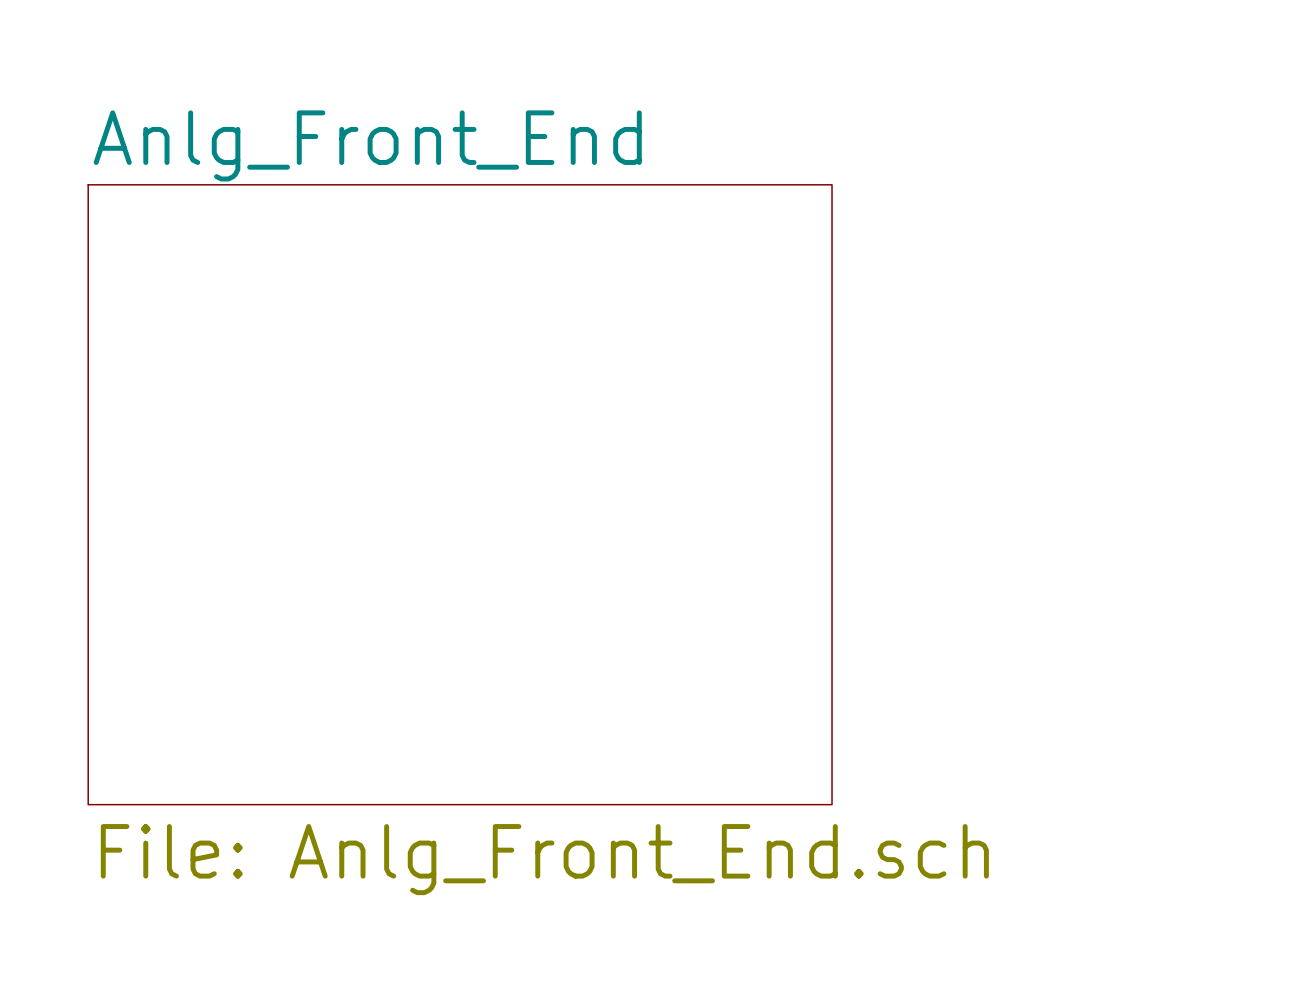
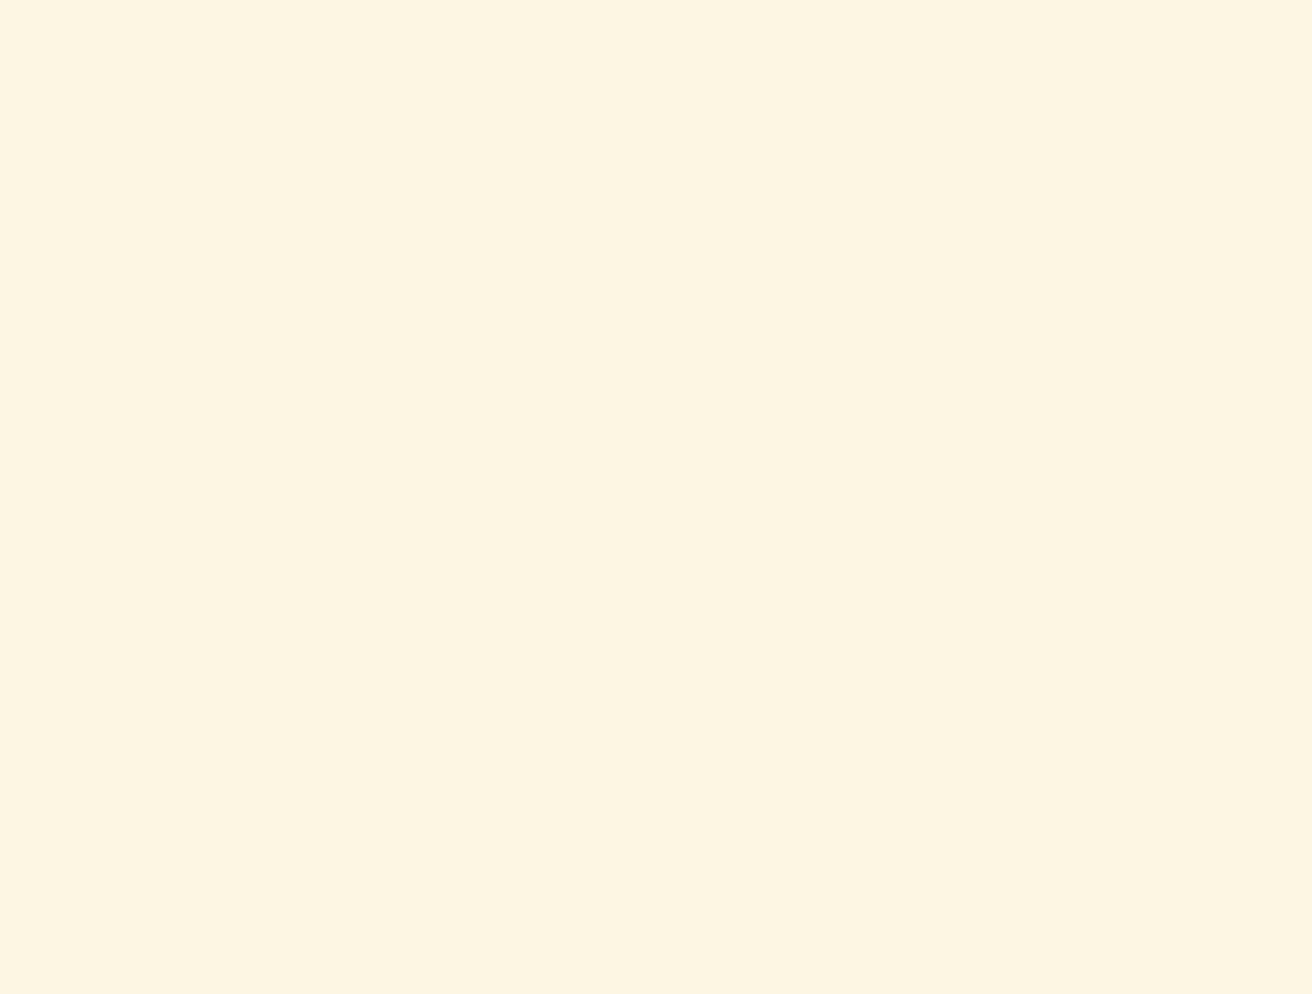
sheet Anlg_Front_End: File: Anlg_Front_End.sch (460, 494) -> none

